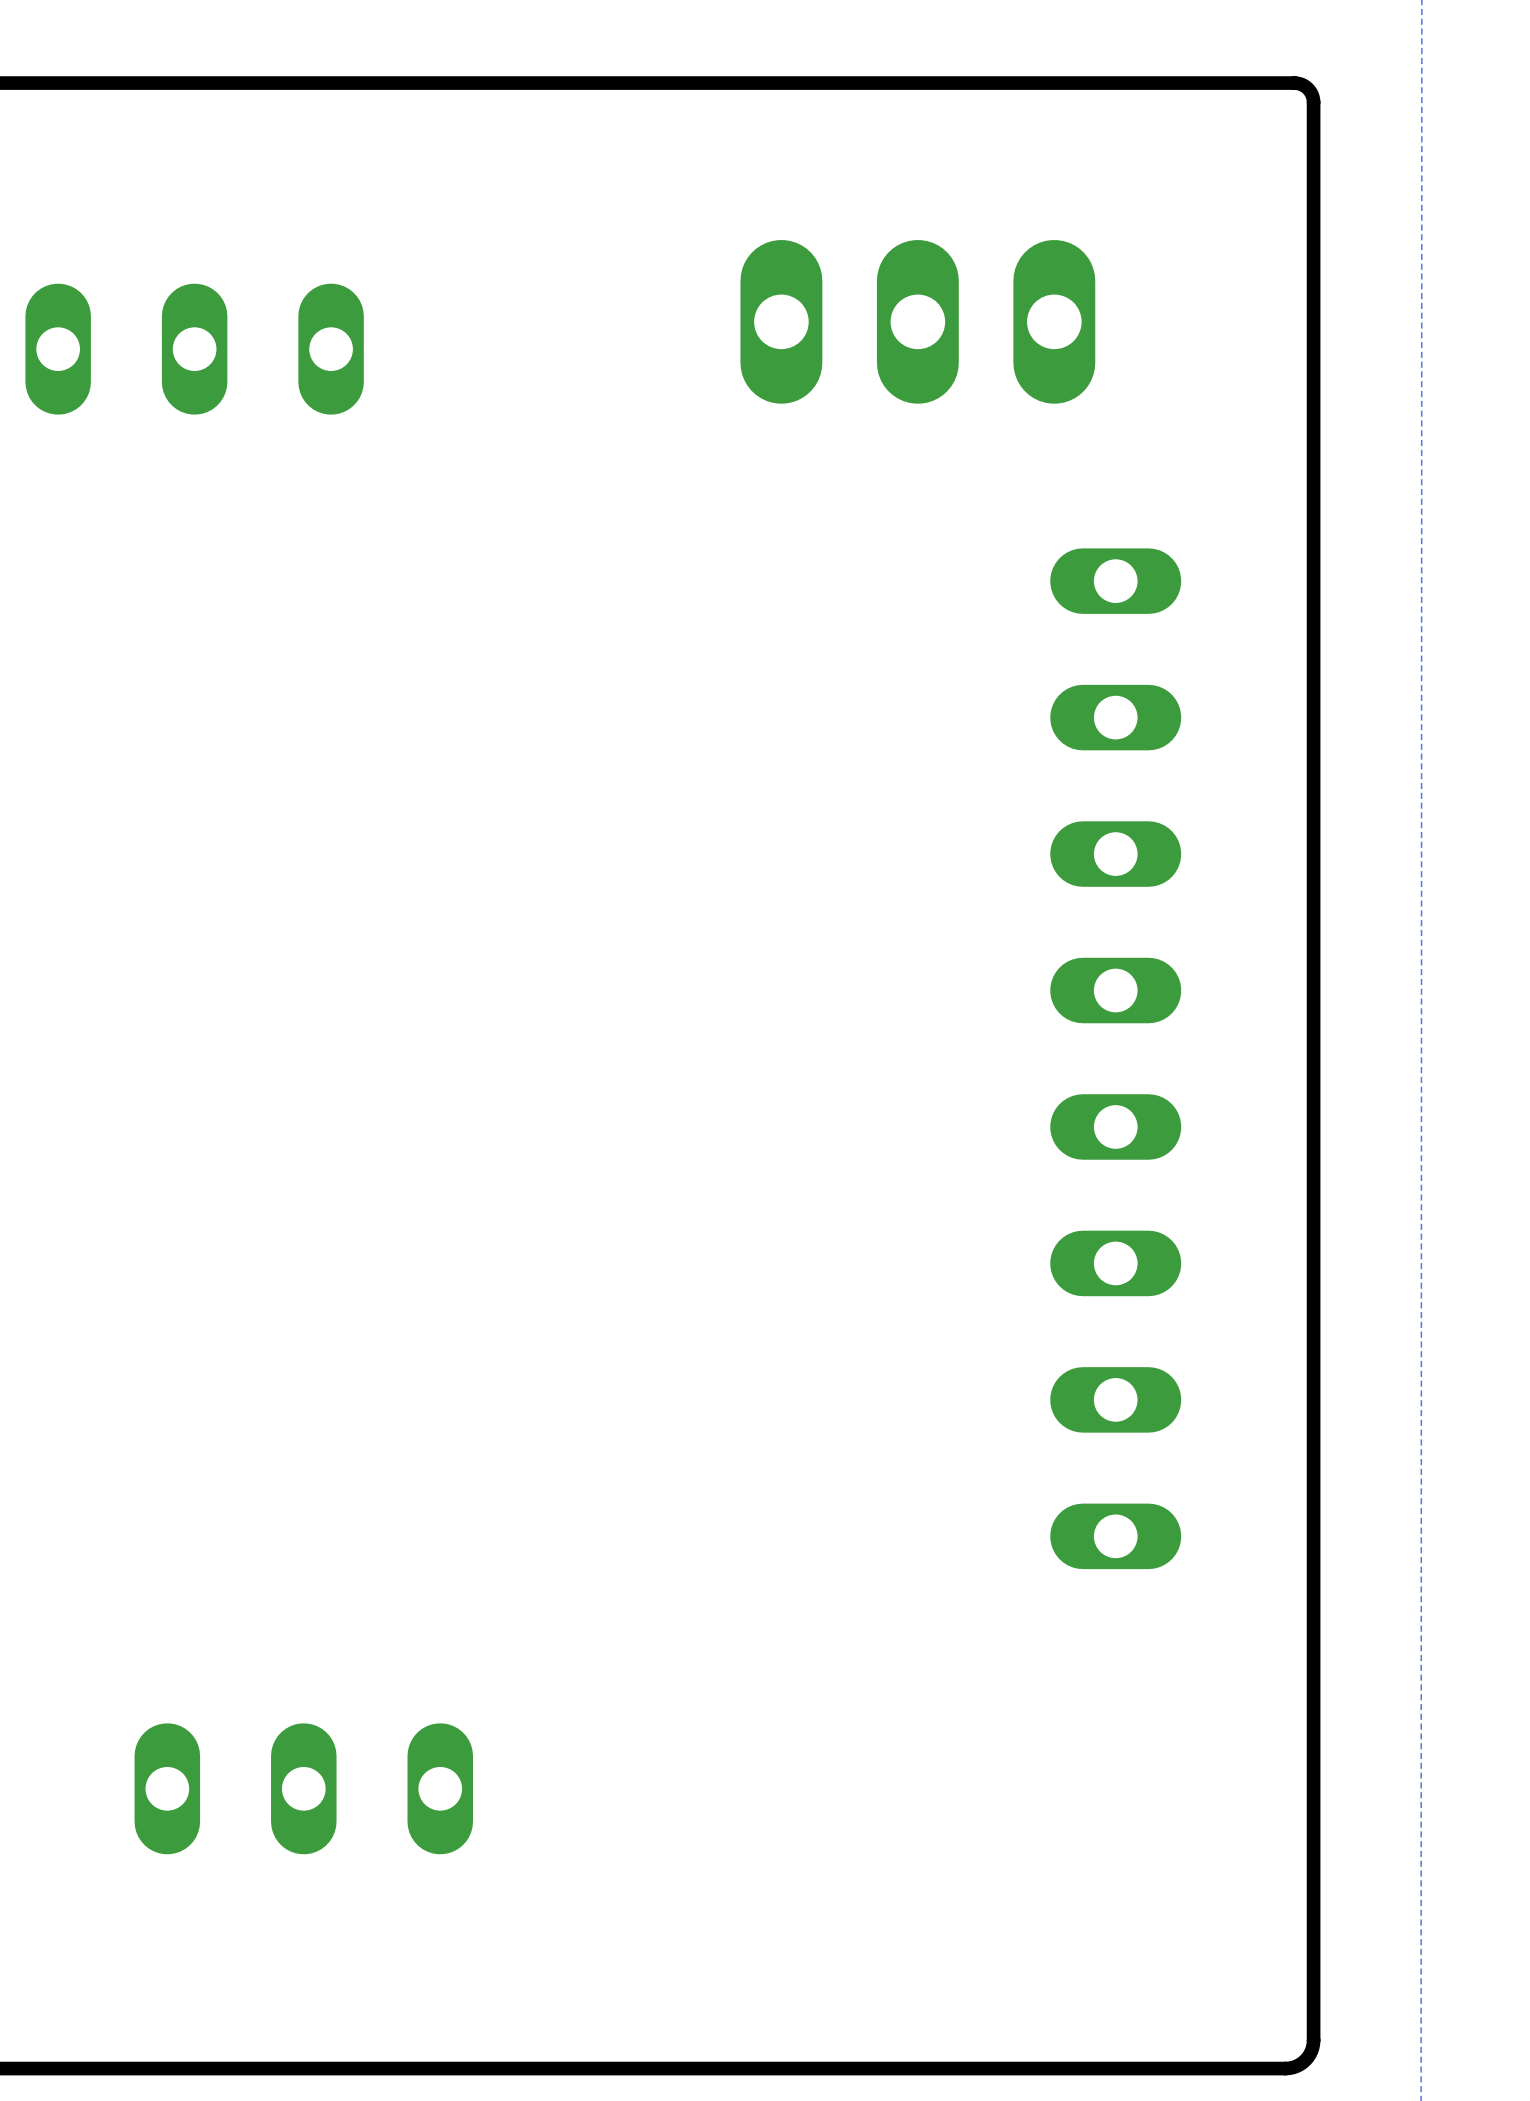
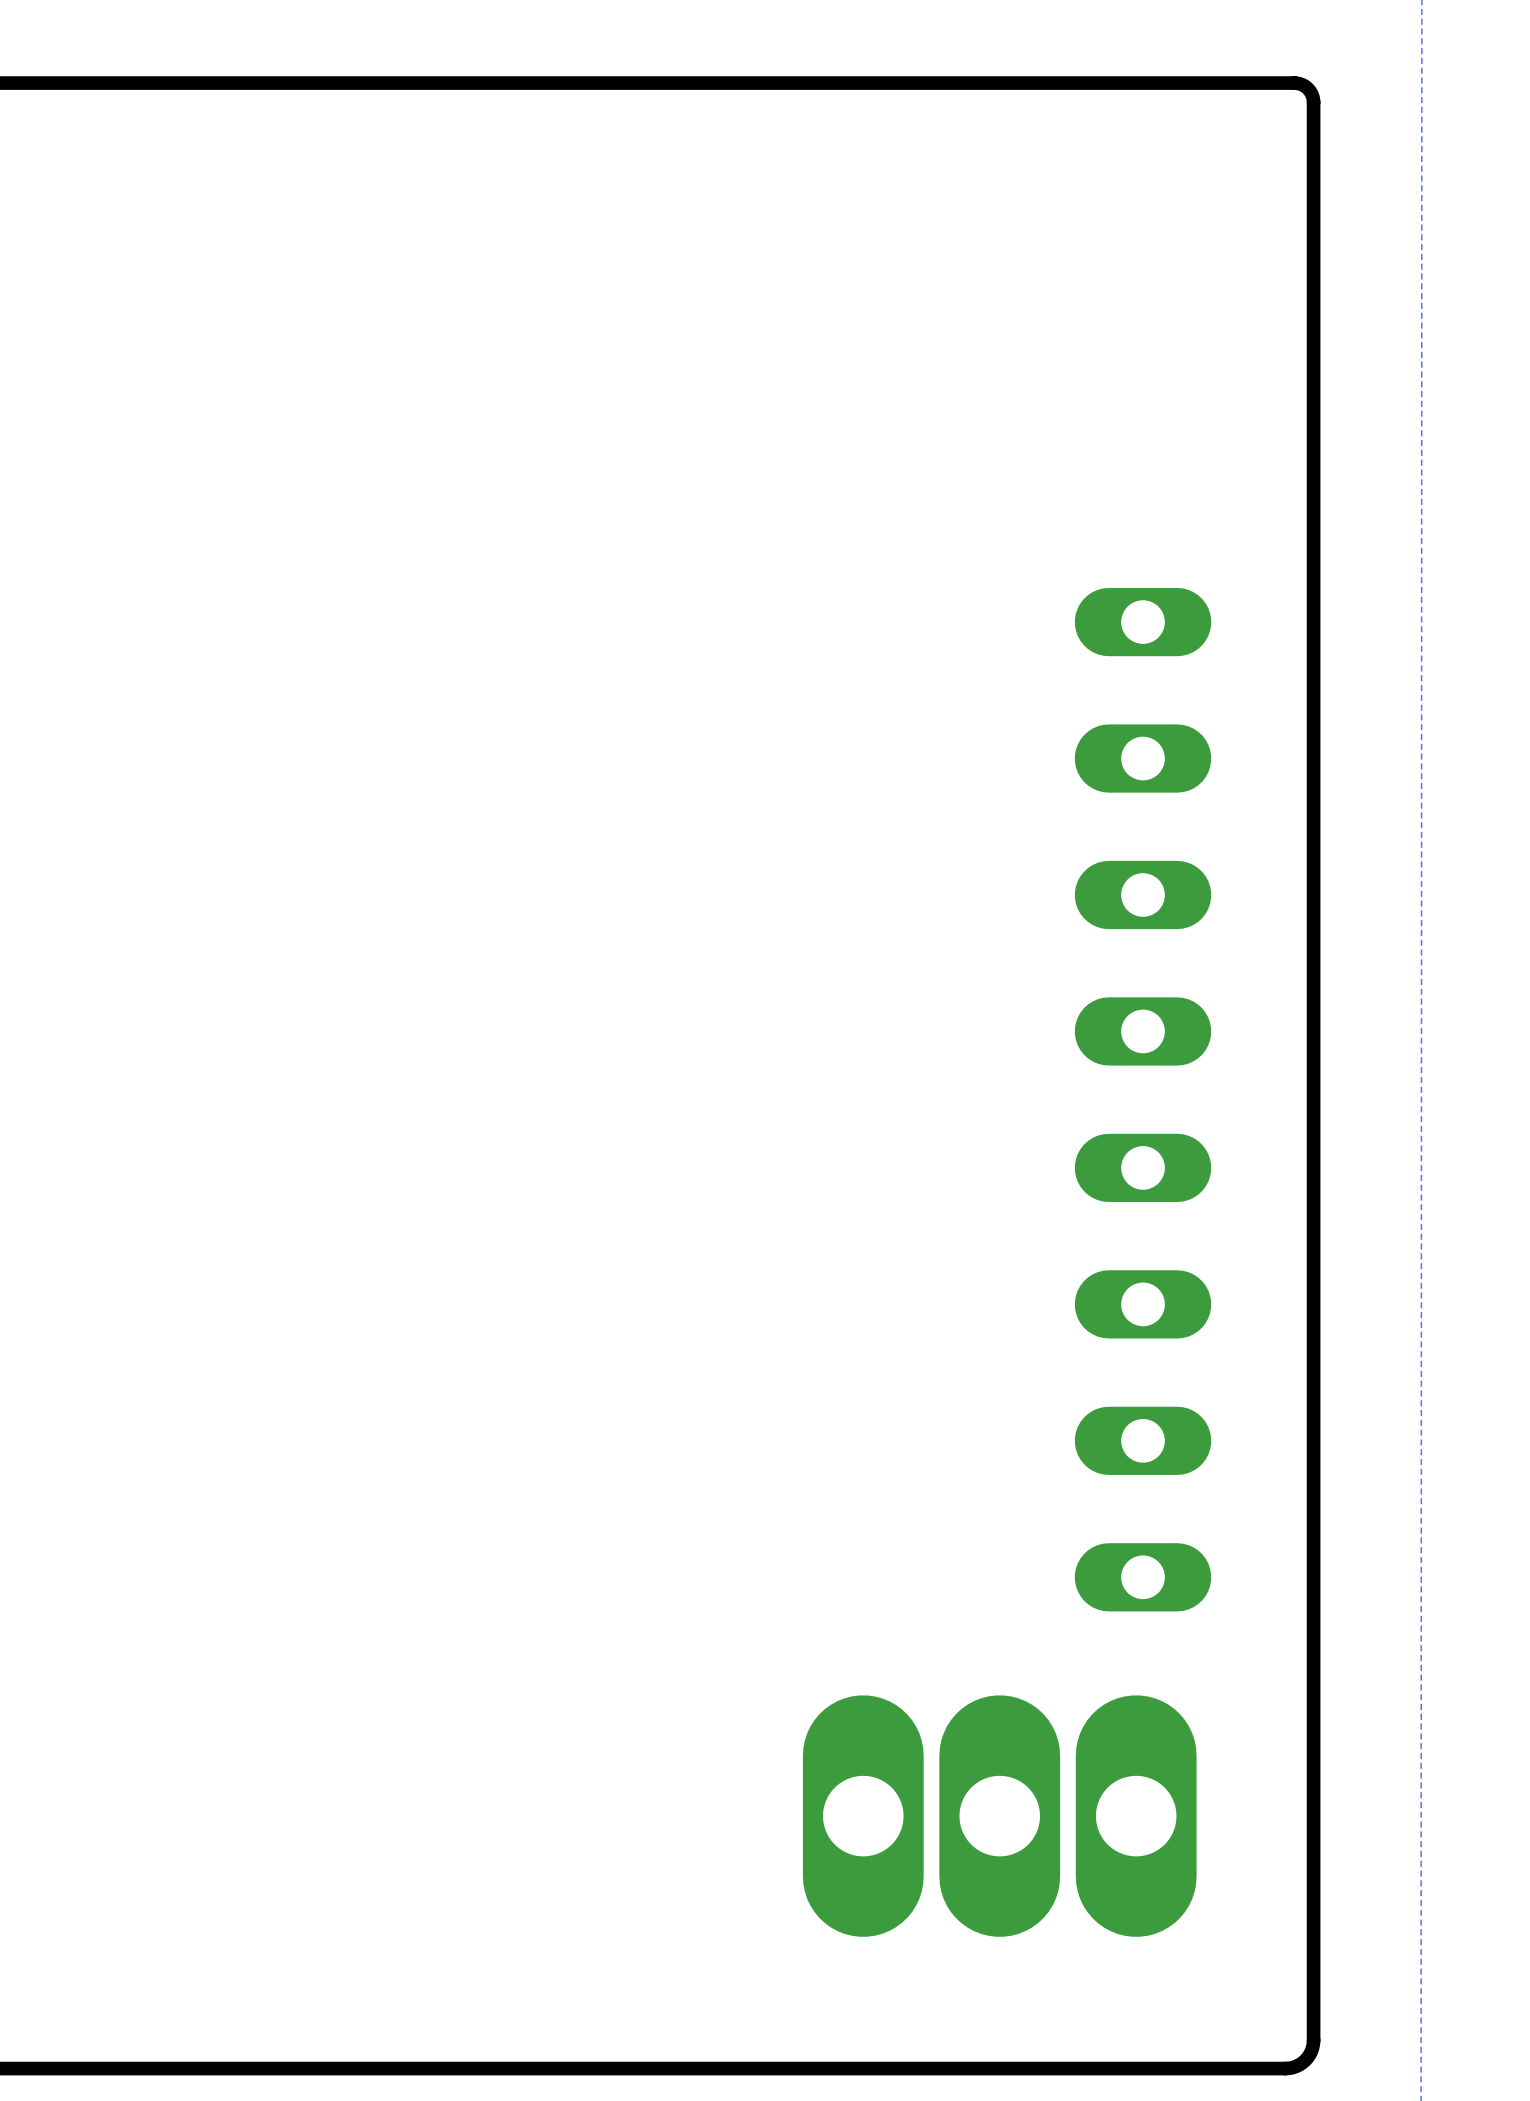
part: (917, 321) -> none
part: (194, 349) -> none
part footprint: [1050, 548, 1182, 1570] -> [1074, 587, 1212, 1612]
part: (303, 1788) -> none
part: none -> (999, 1816)

